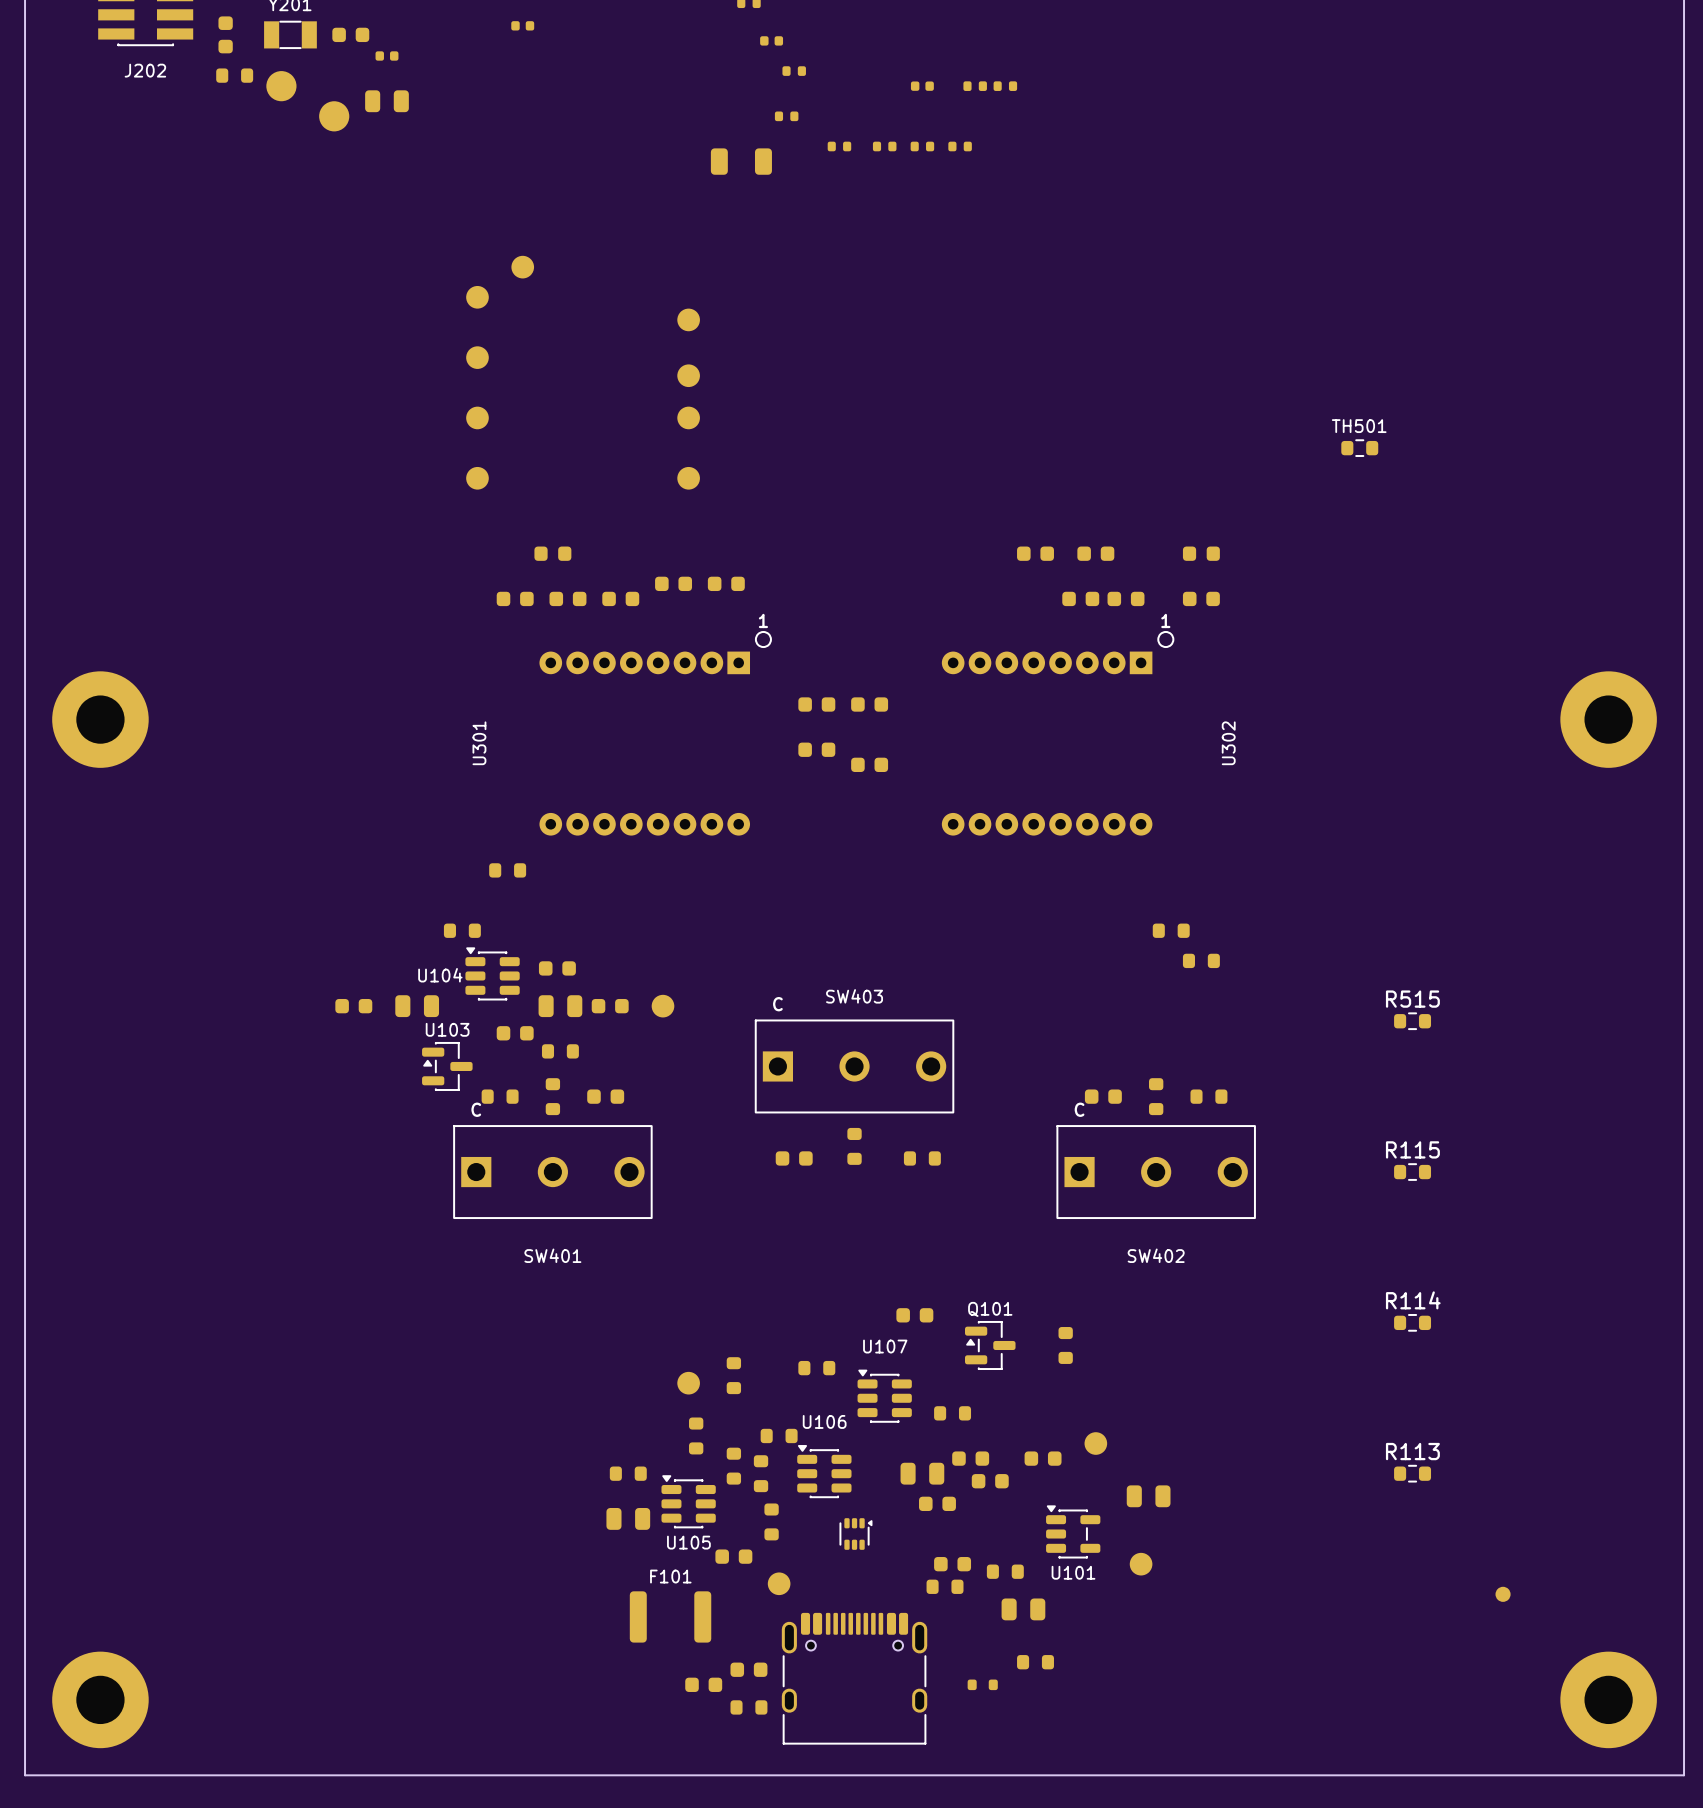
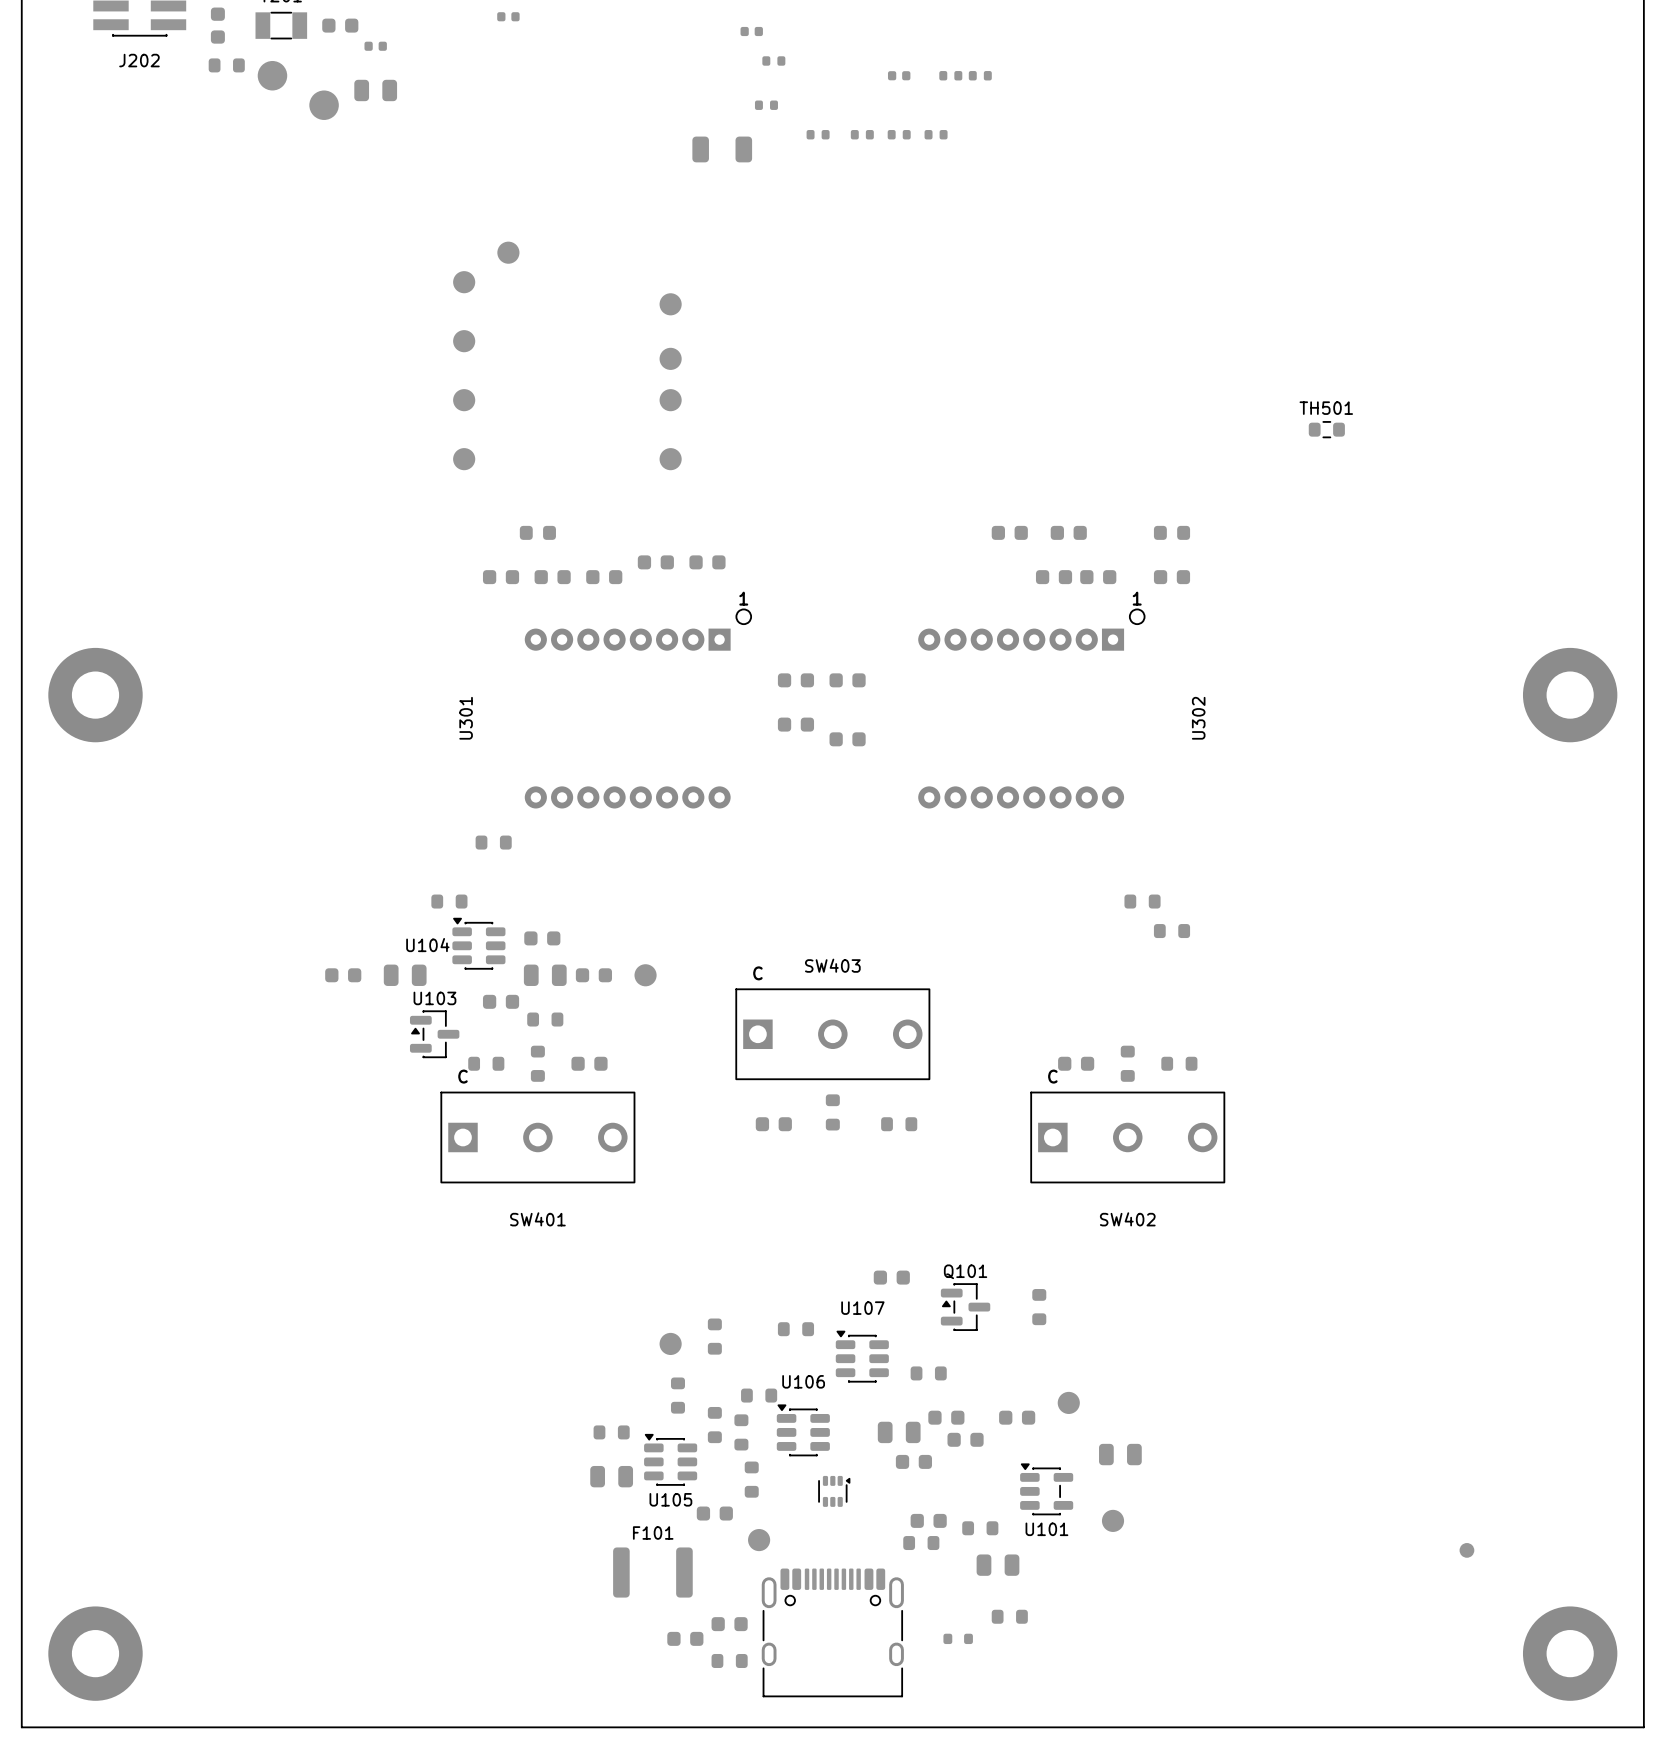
R515: (1412, 1021) -> none
R115: (1412, 1172) -> none
R114: (1412, 1322) -> none
R113: (1412, 1473) -> none

